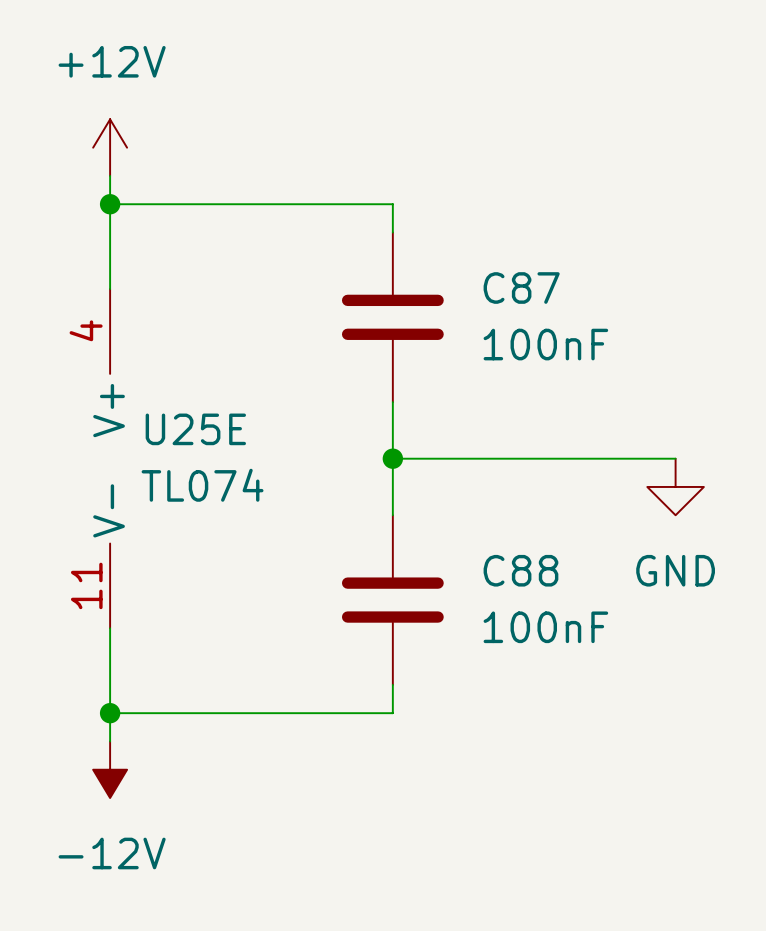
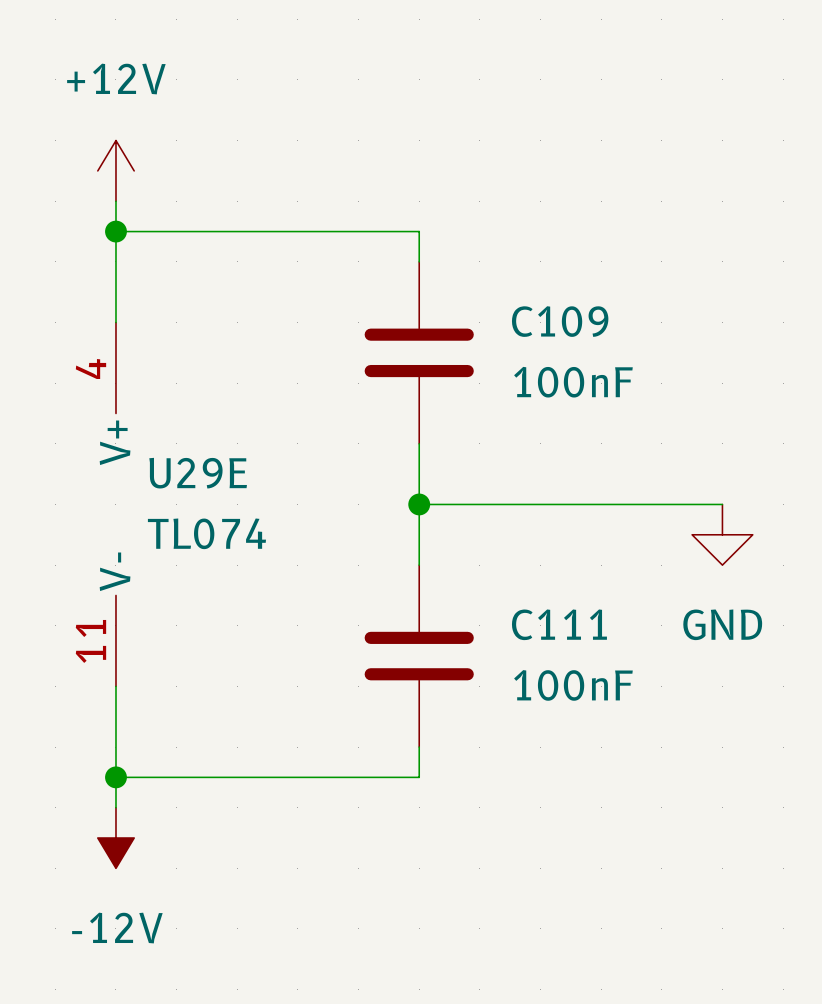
C87 name: C87 (521, 288) -> C109 (560, 321)
U25E name: U25E (195, 429) -> U29E (198, 473)
C88 name: C88 (520, 570) -> C111 (559, 624)

